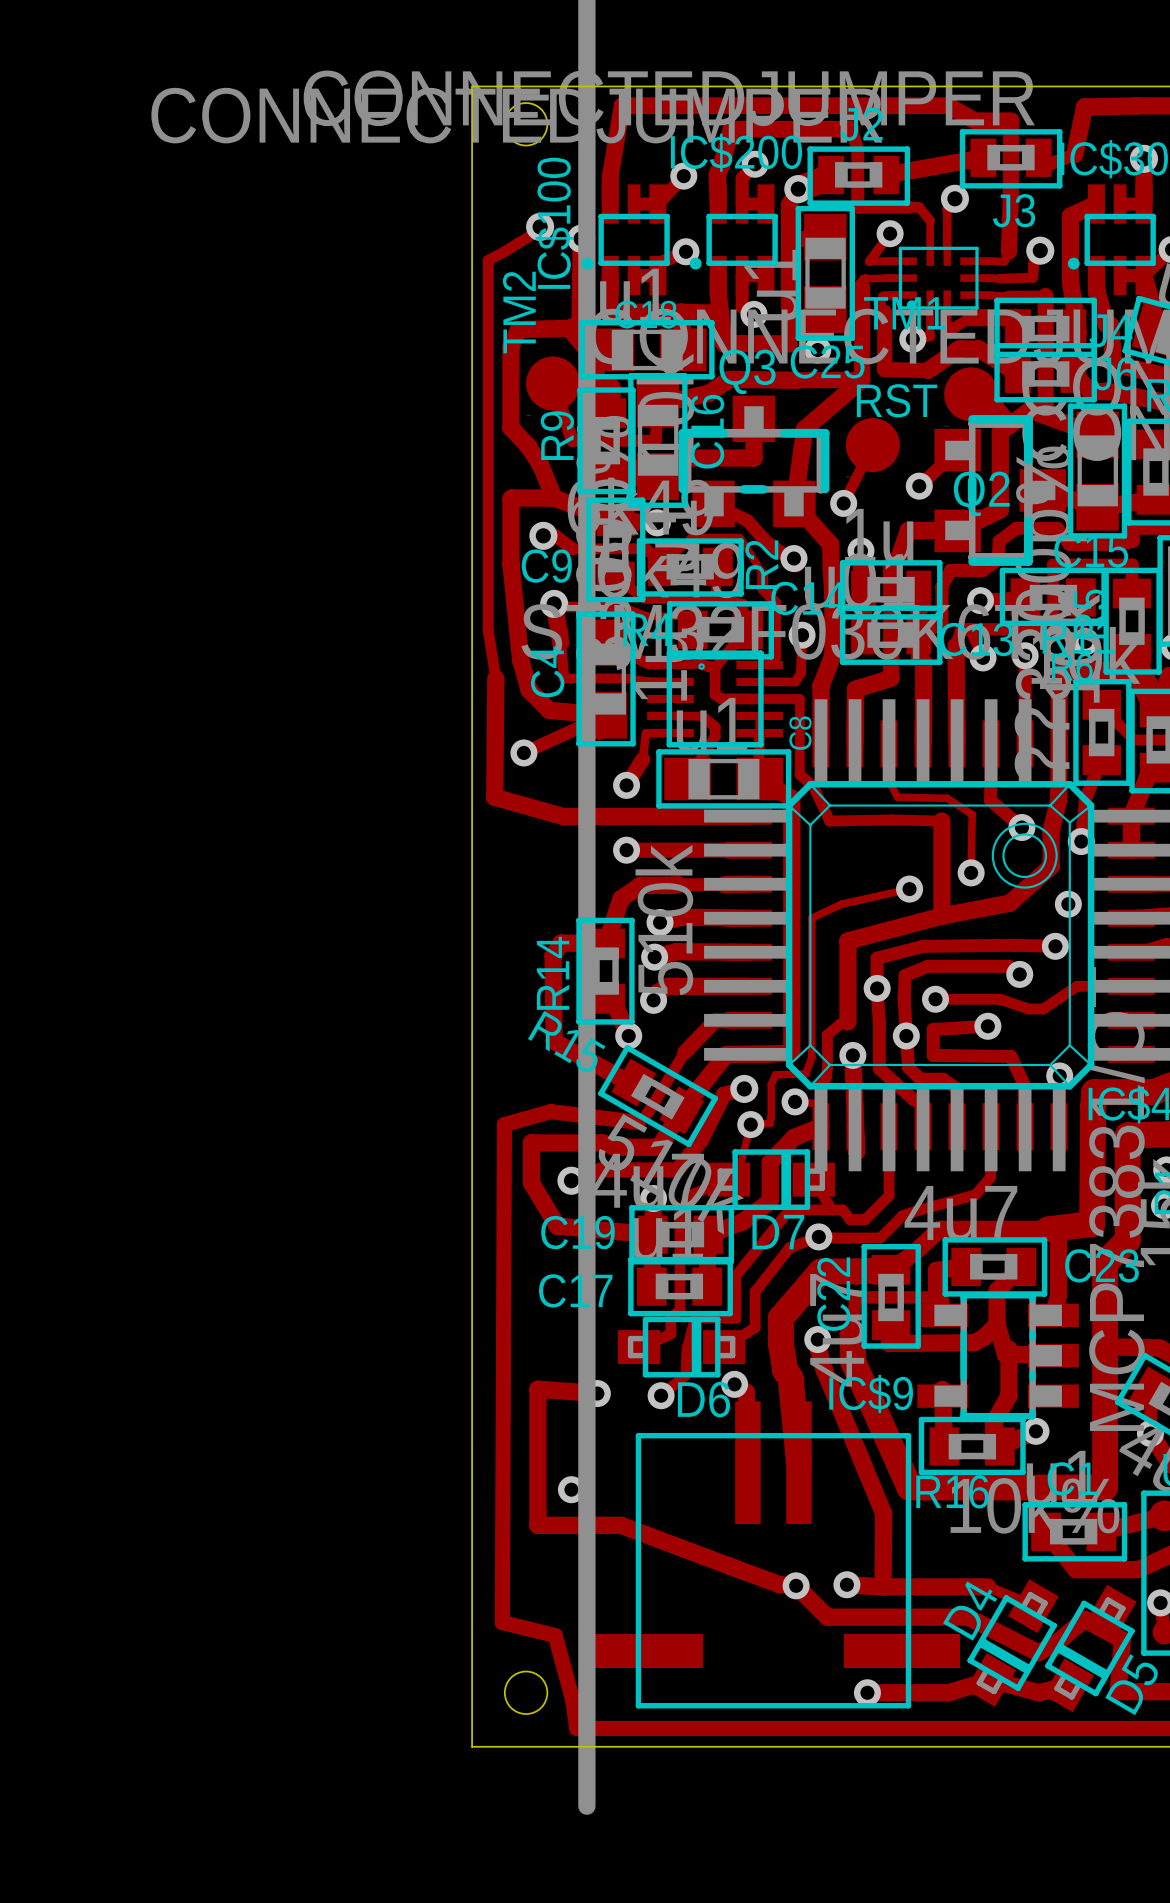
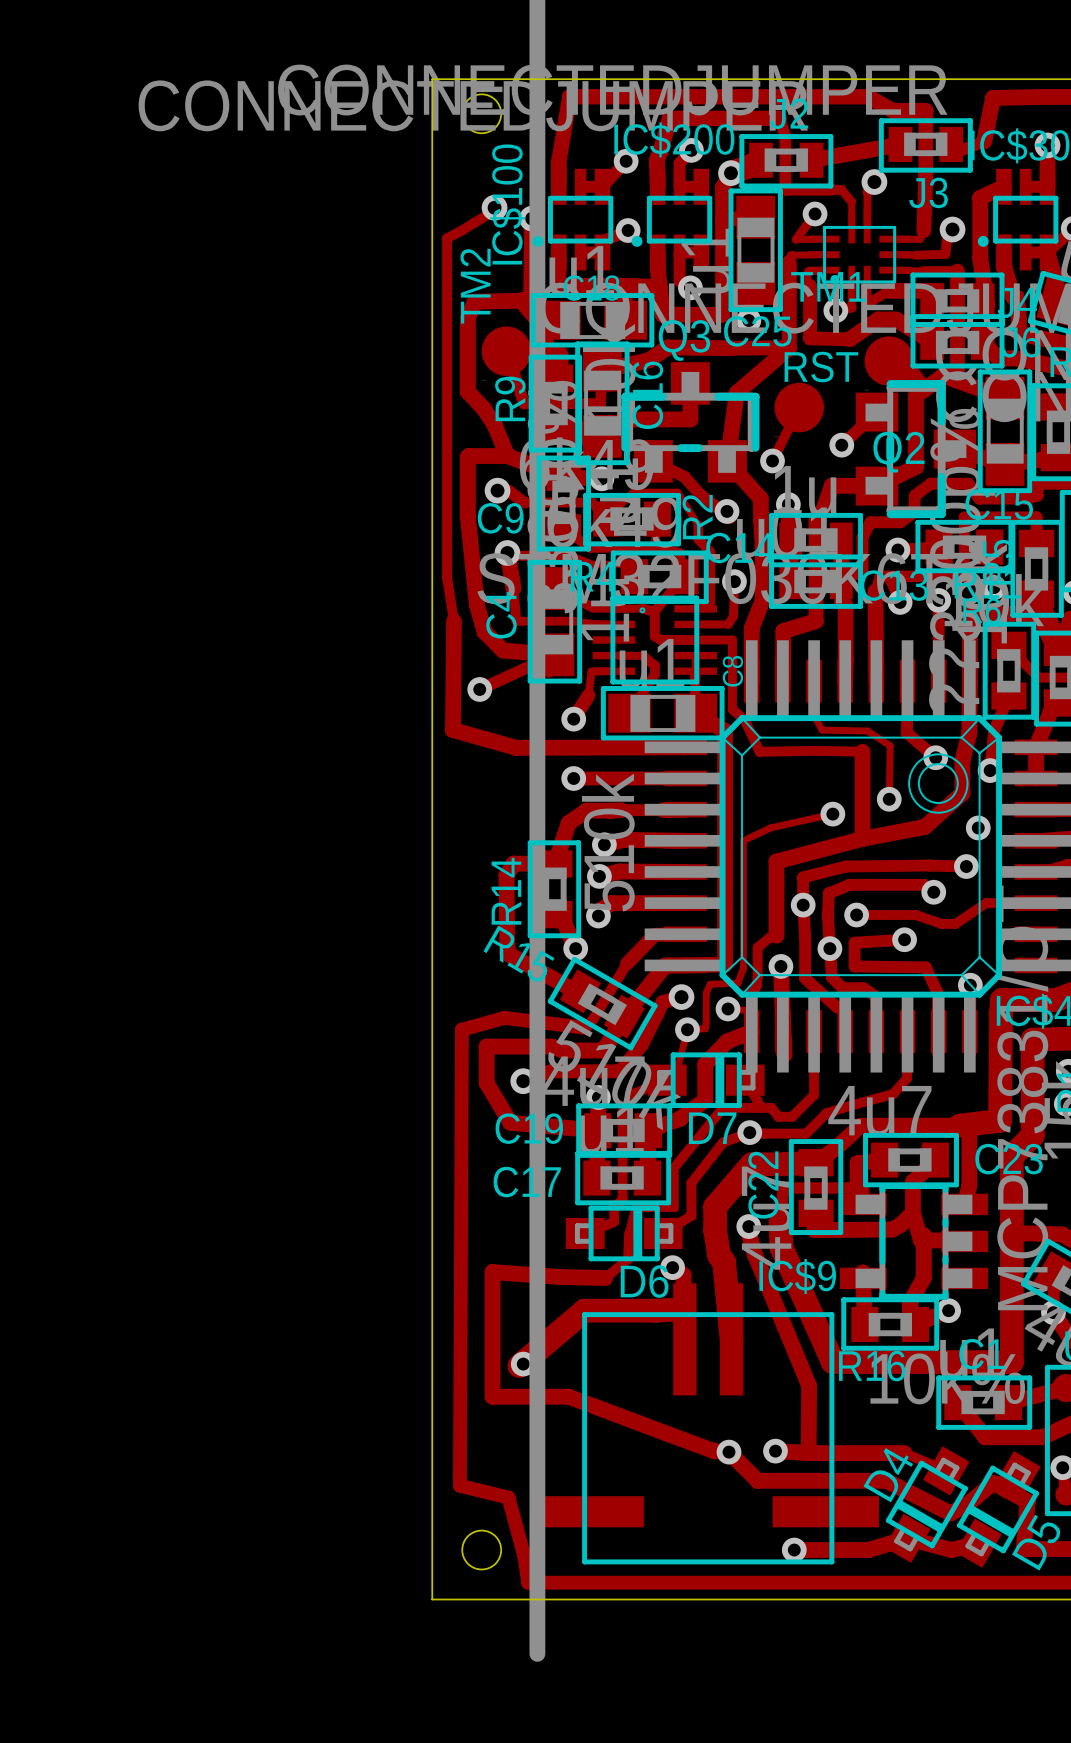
track: (537, 1389) (597, 1393) -> (492, 1272) (605, 1278)
via: (597, 1393) -> none
via: (661, 1395) -> none
track: none -> (684, 1309) (584, 1310) (519, 1366)

